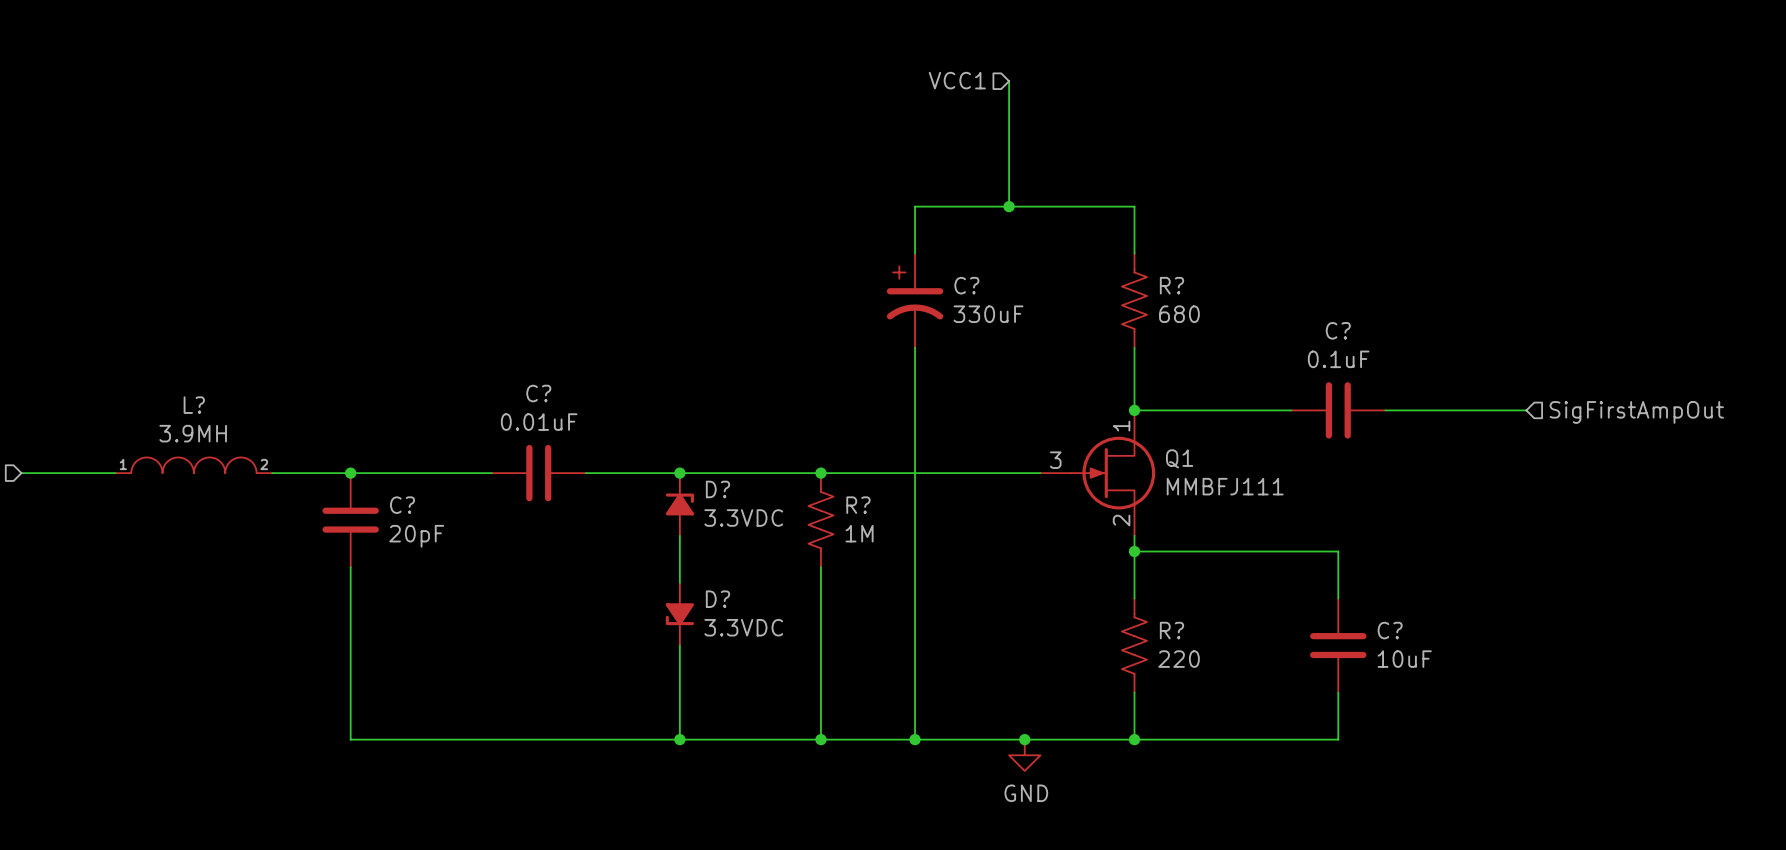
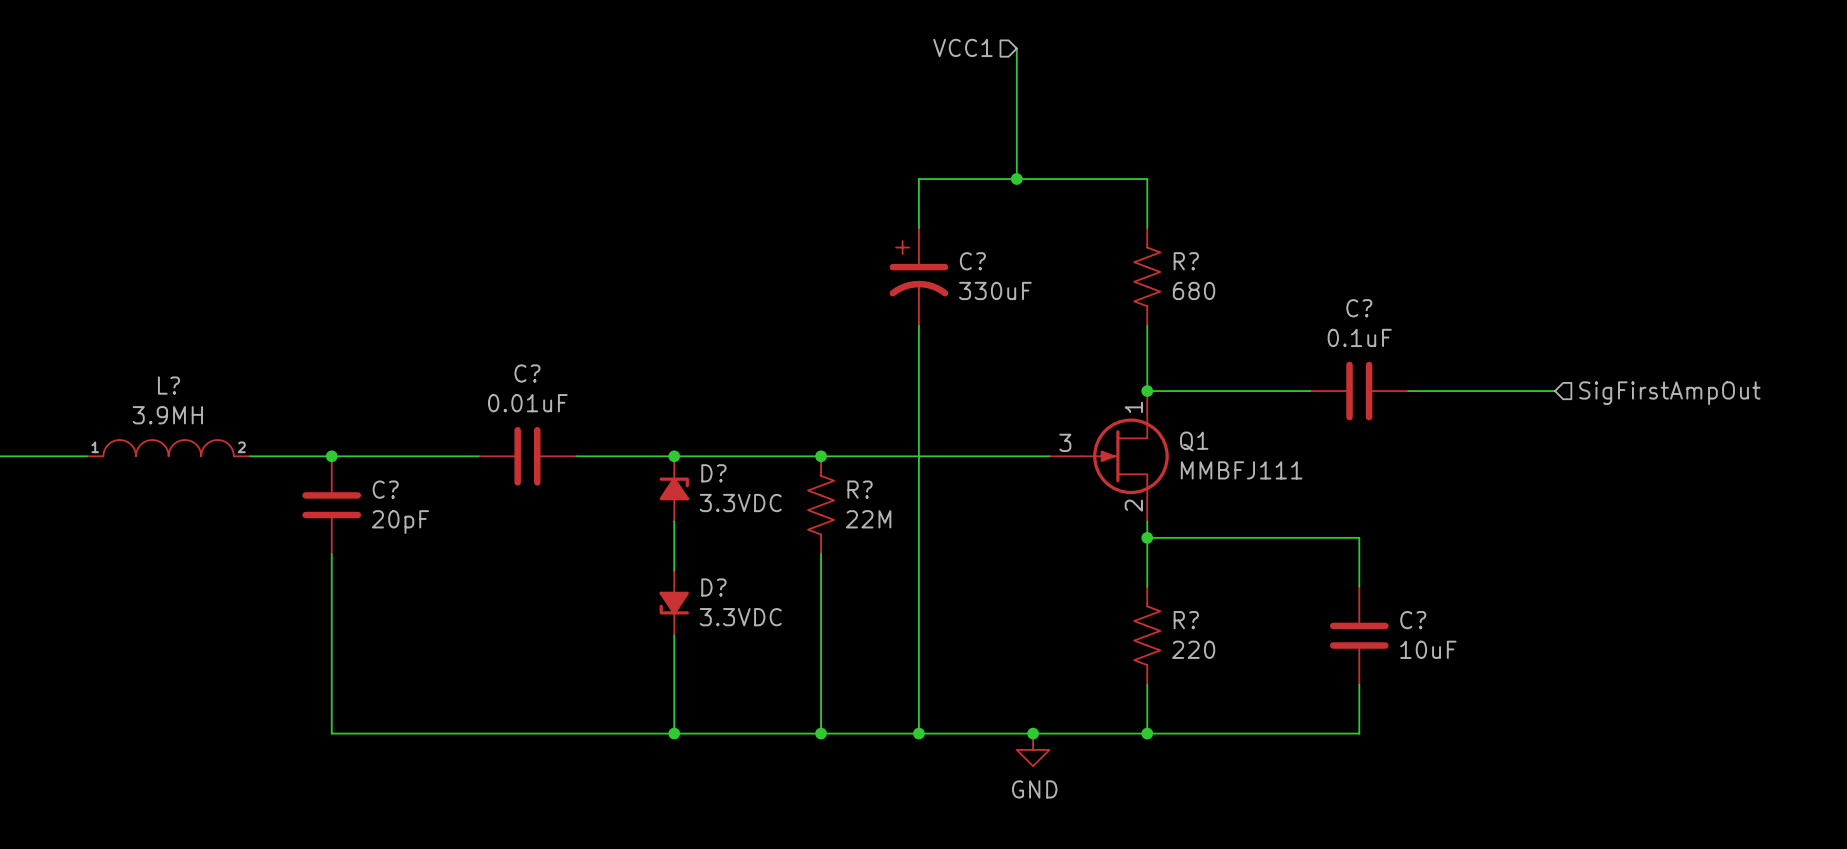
R? value: 1M (859, 533) -> 22M (868, 519)

